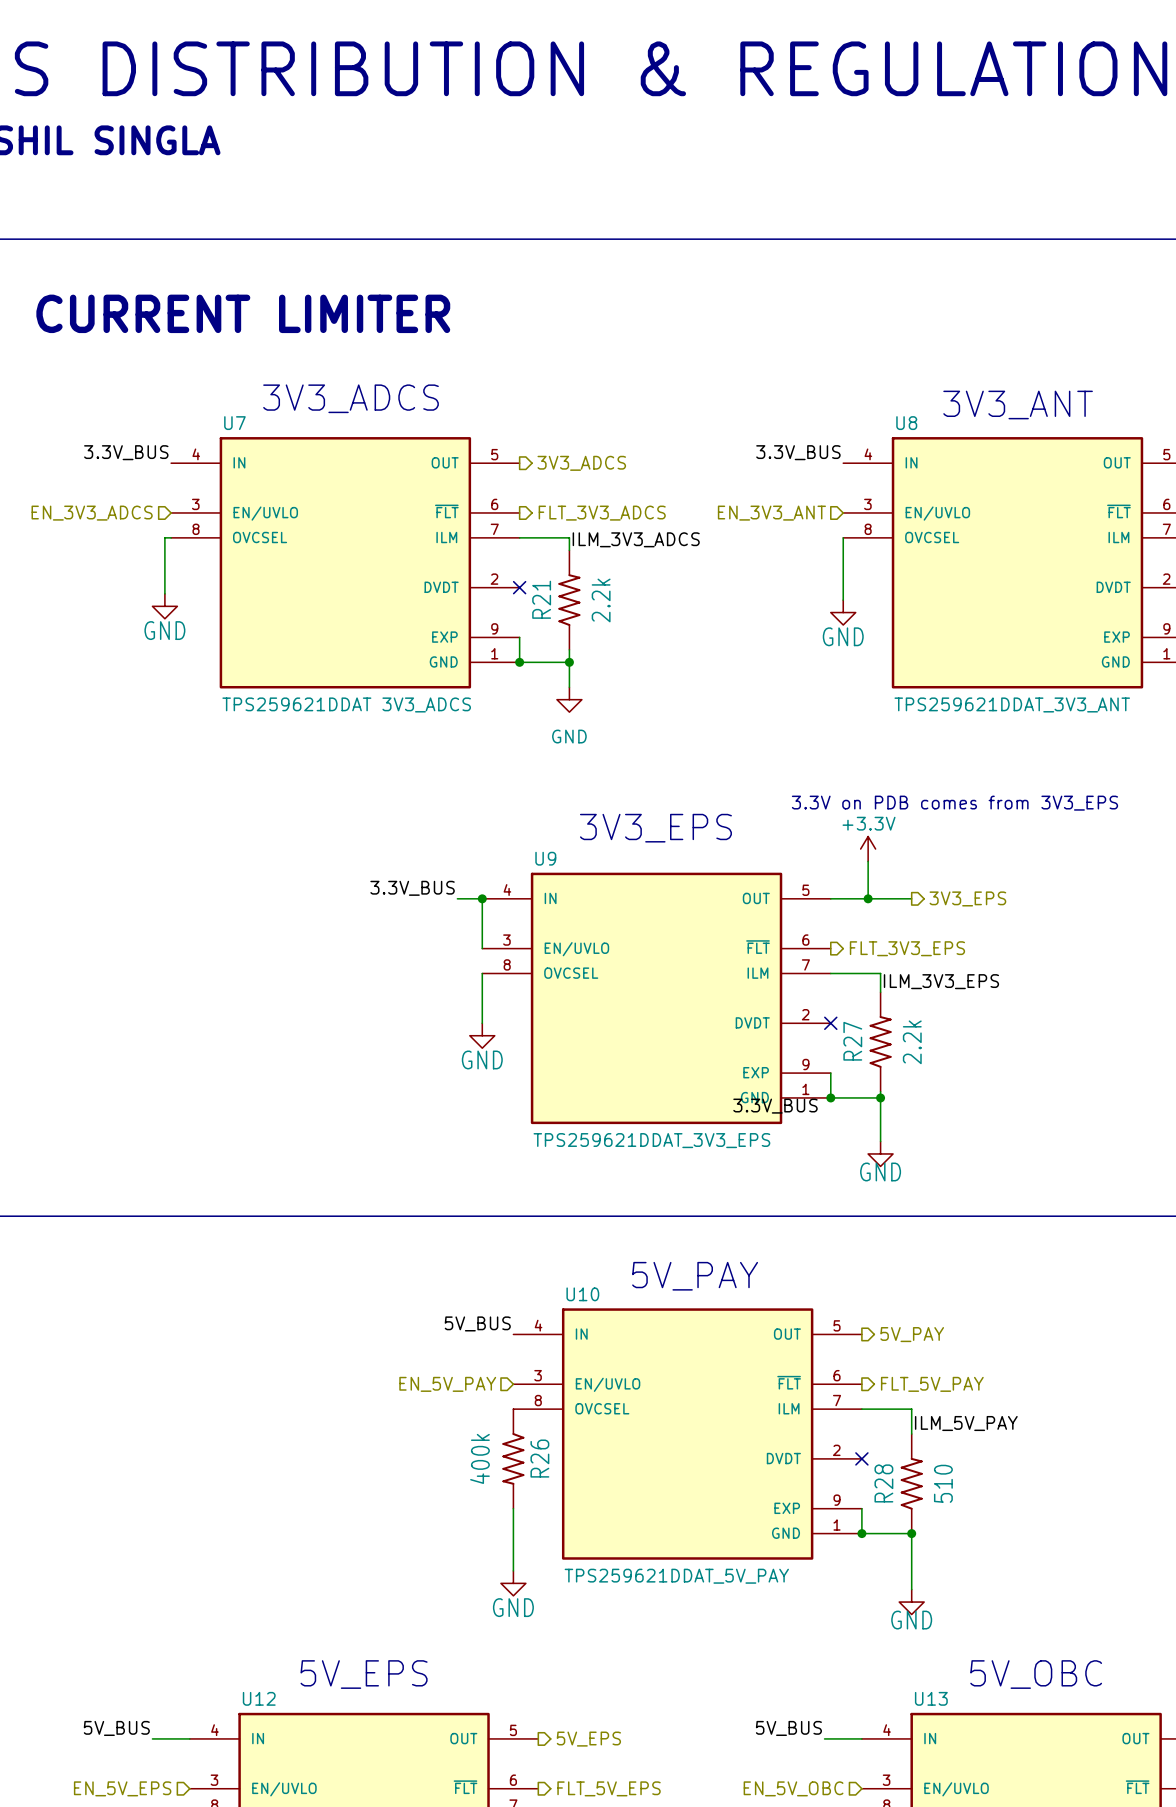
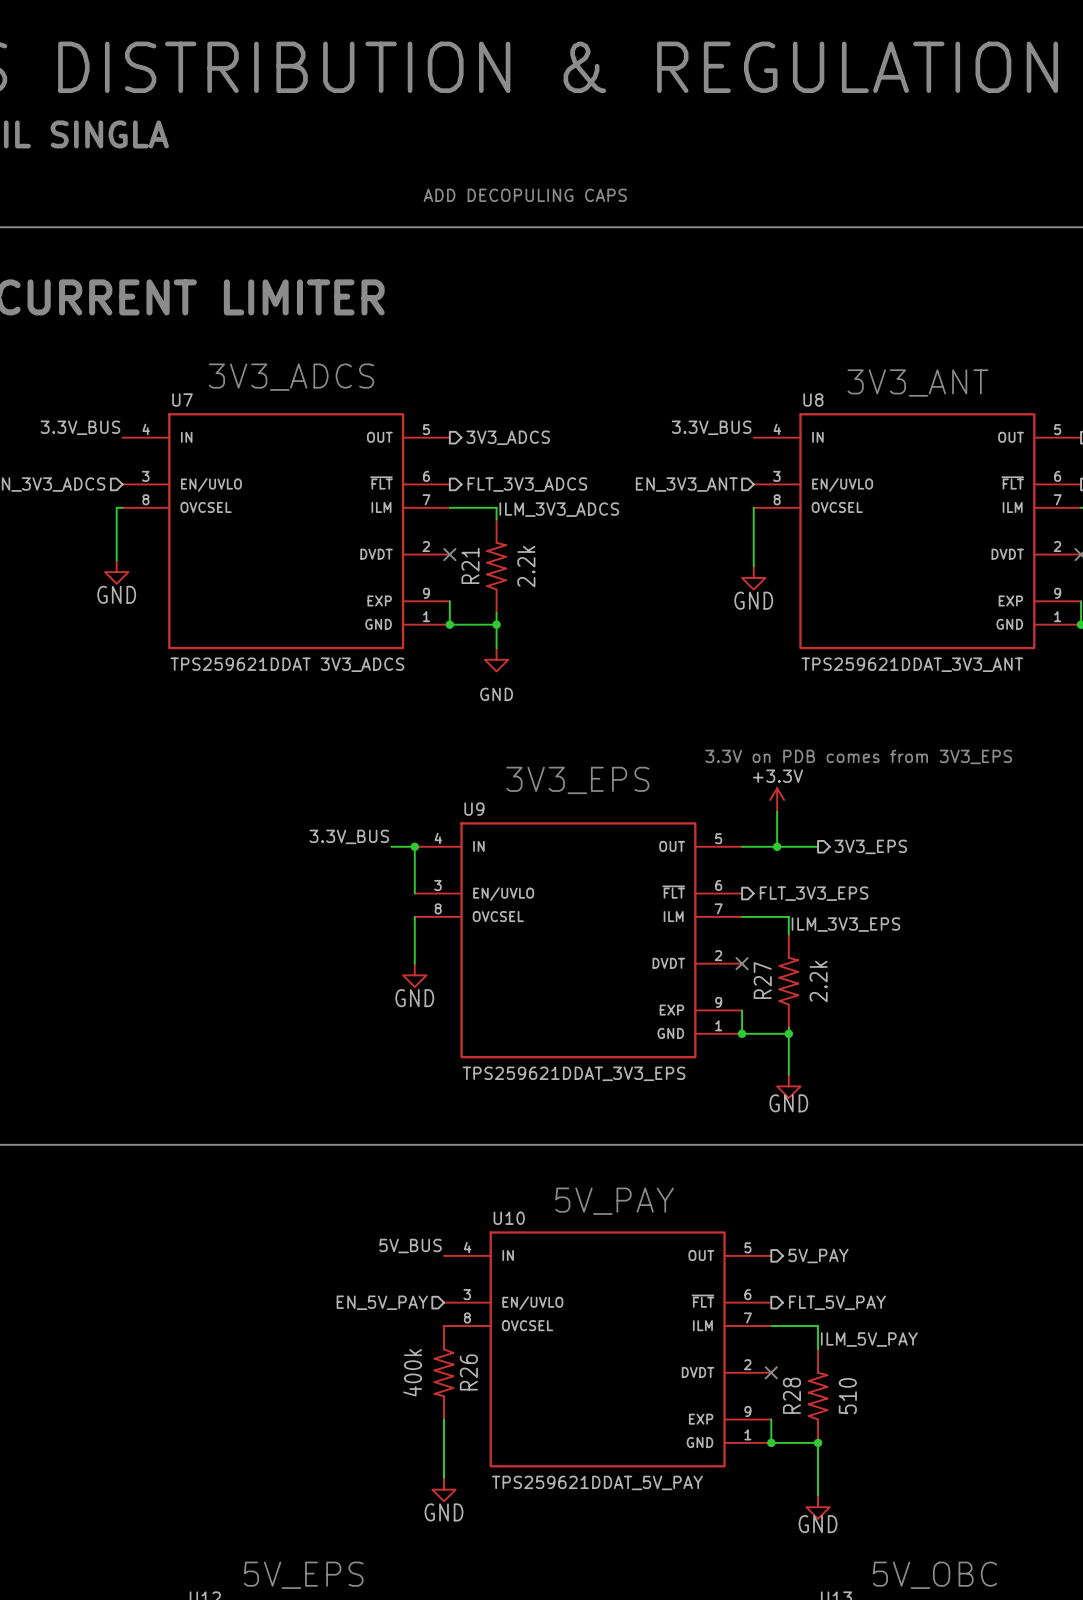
text: none -> ADD DECOPULING CAPS (525, 195)
label: 3.3V_BUS (775, 1106) -> none

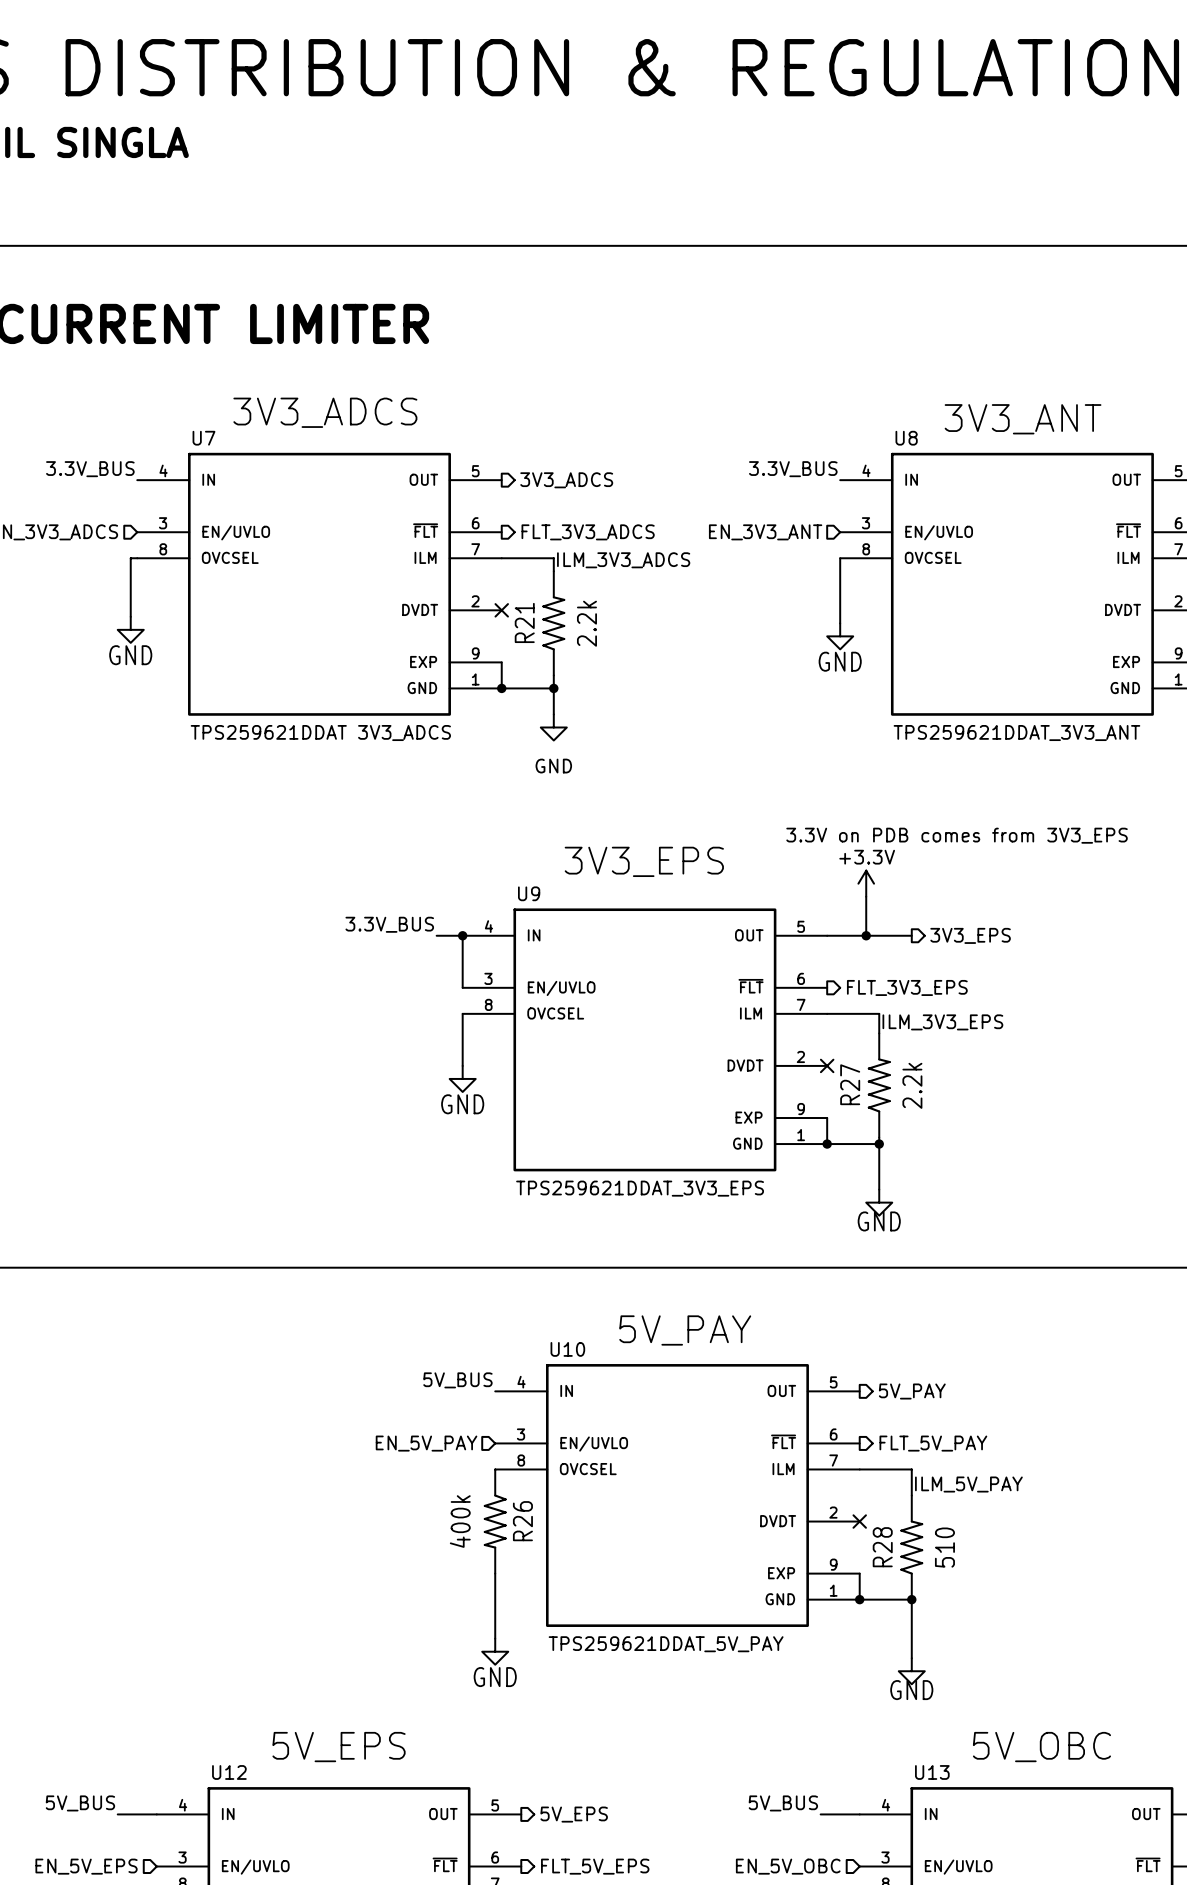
text: ADD DECOPULING CAPS (525, 195) -> none

